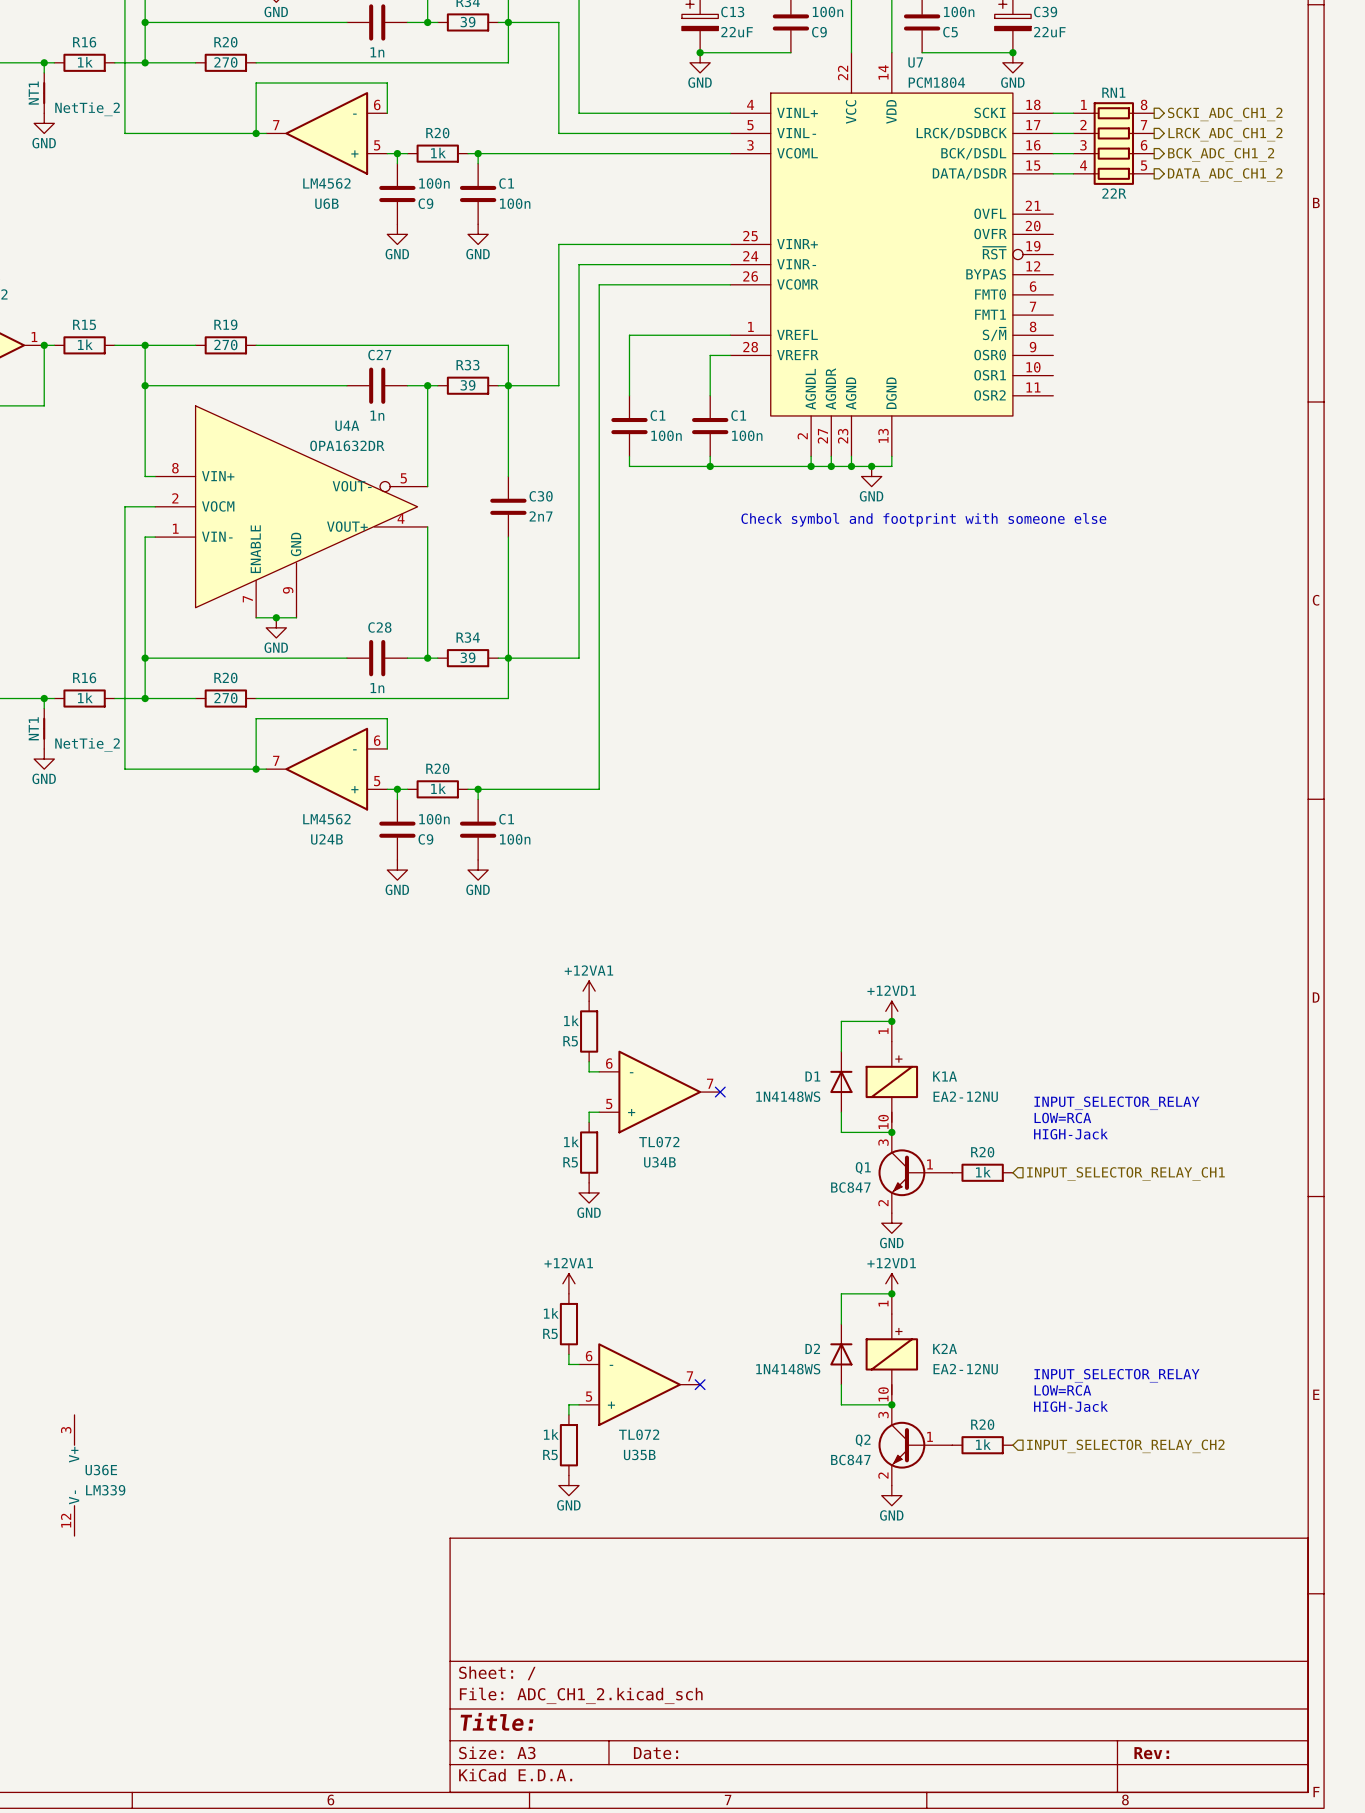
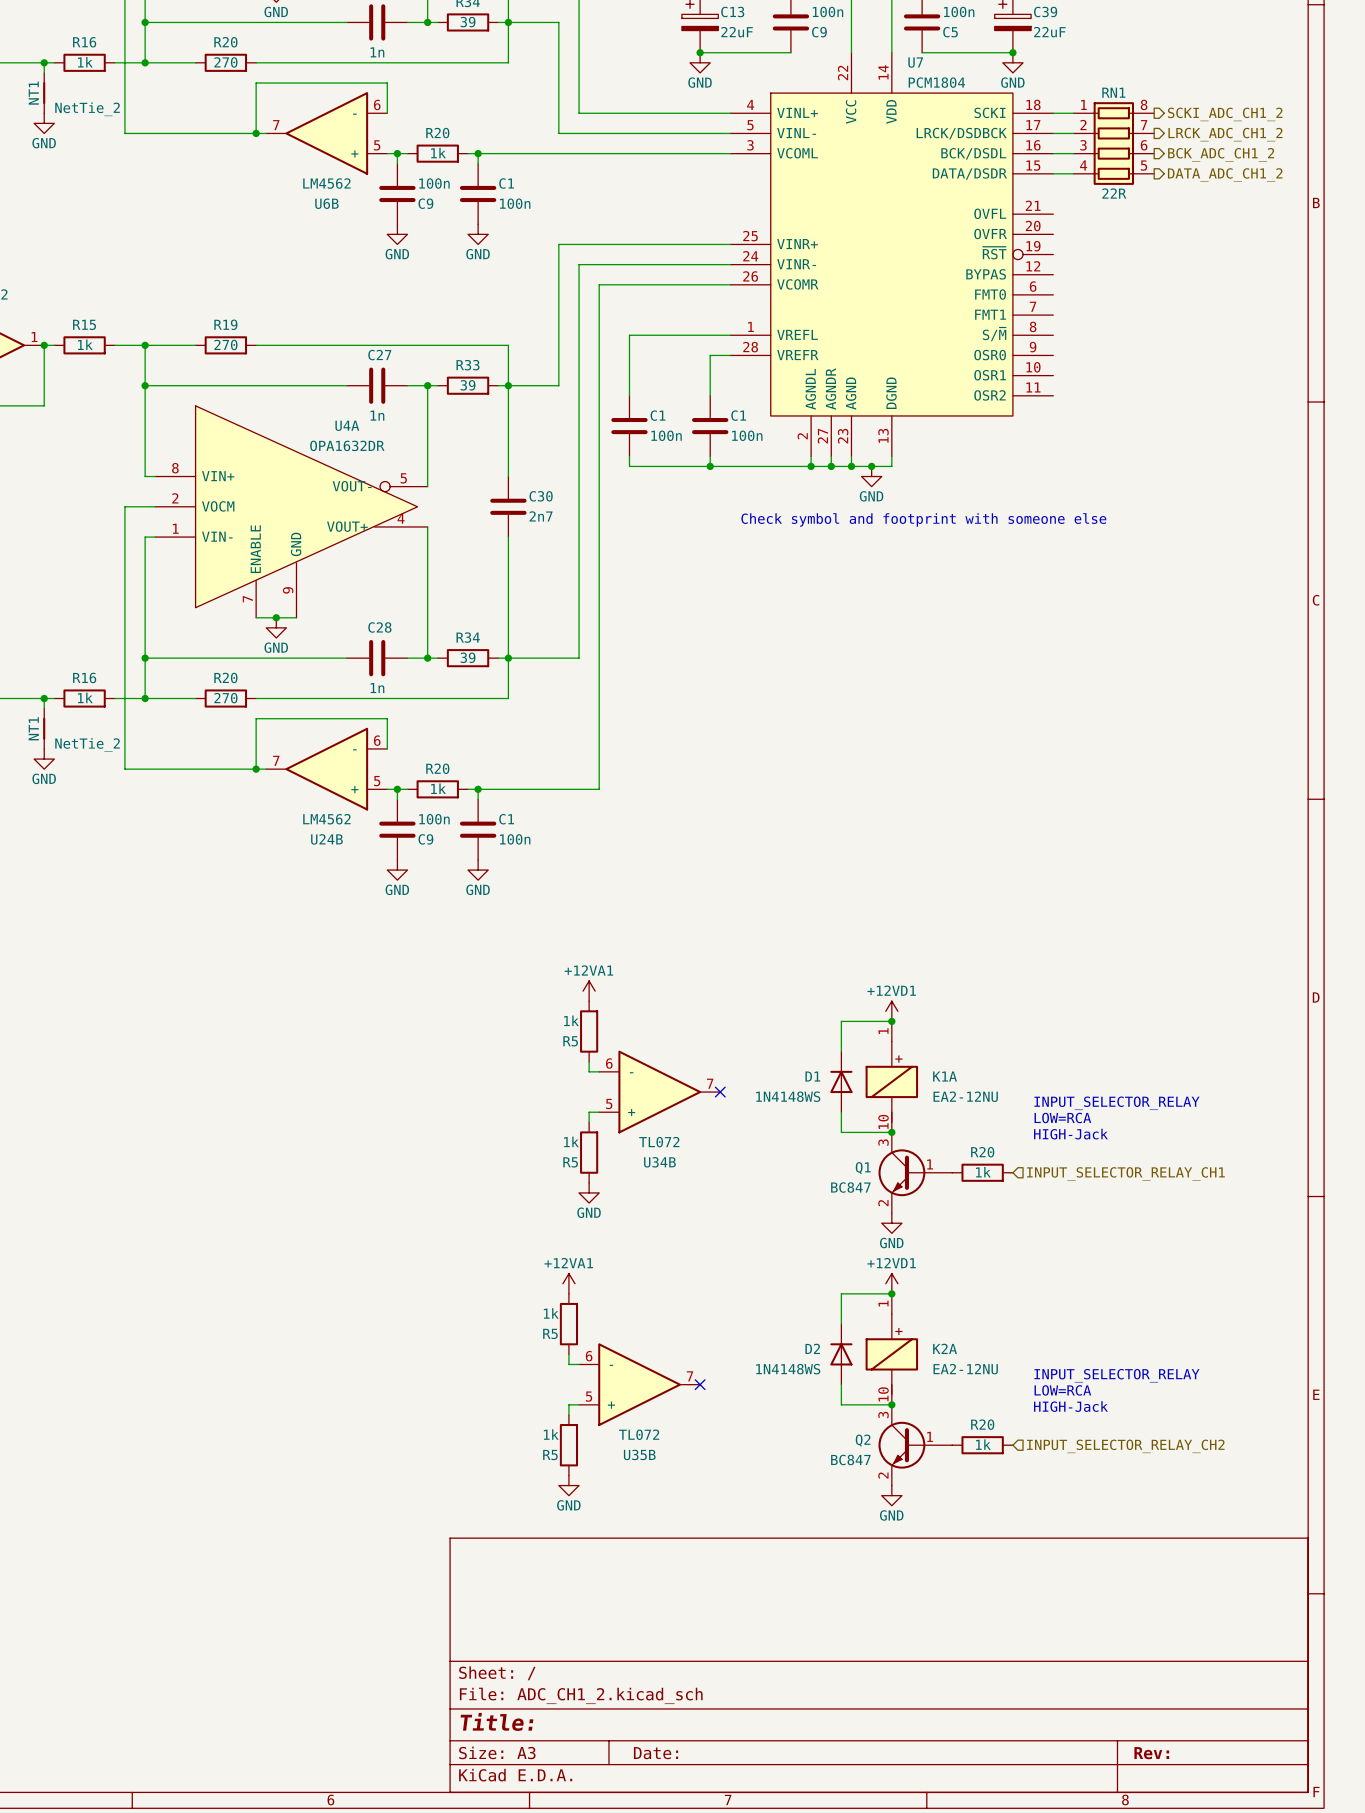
U36E: LM339 (74, 1475) -> none

